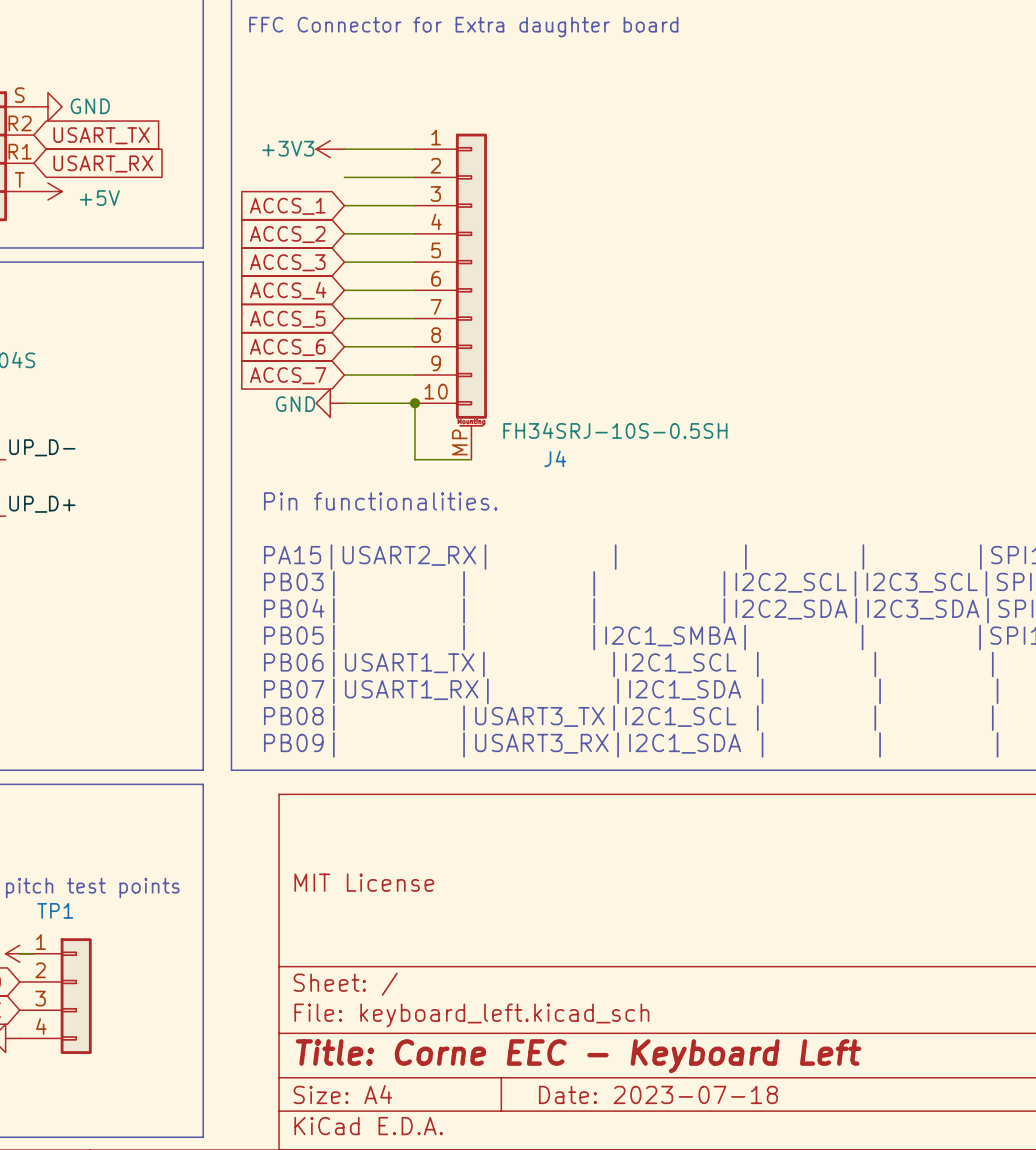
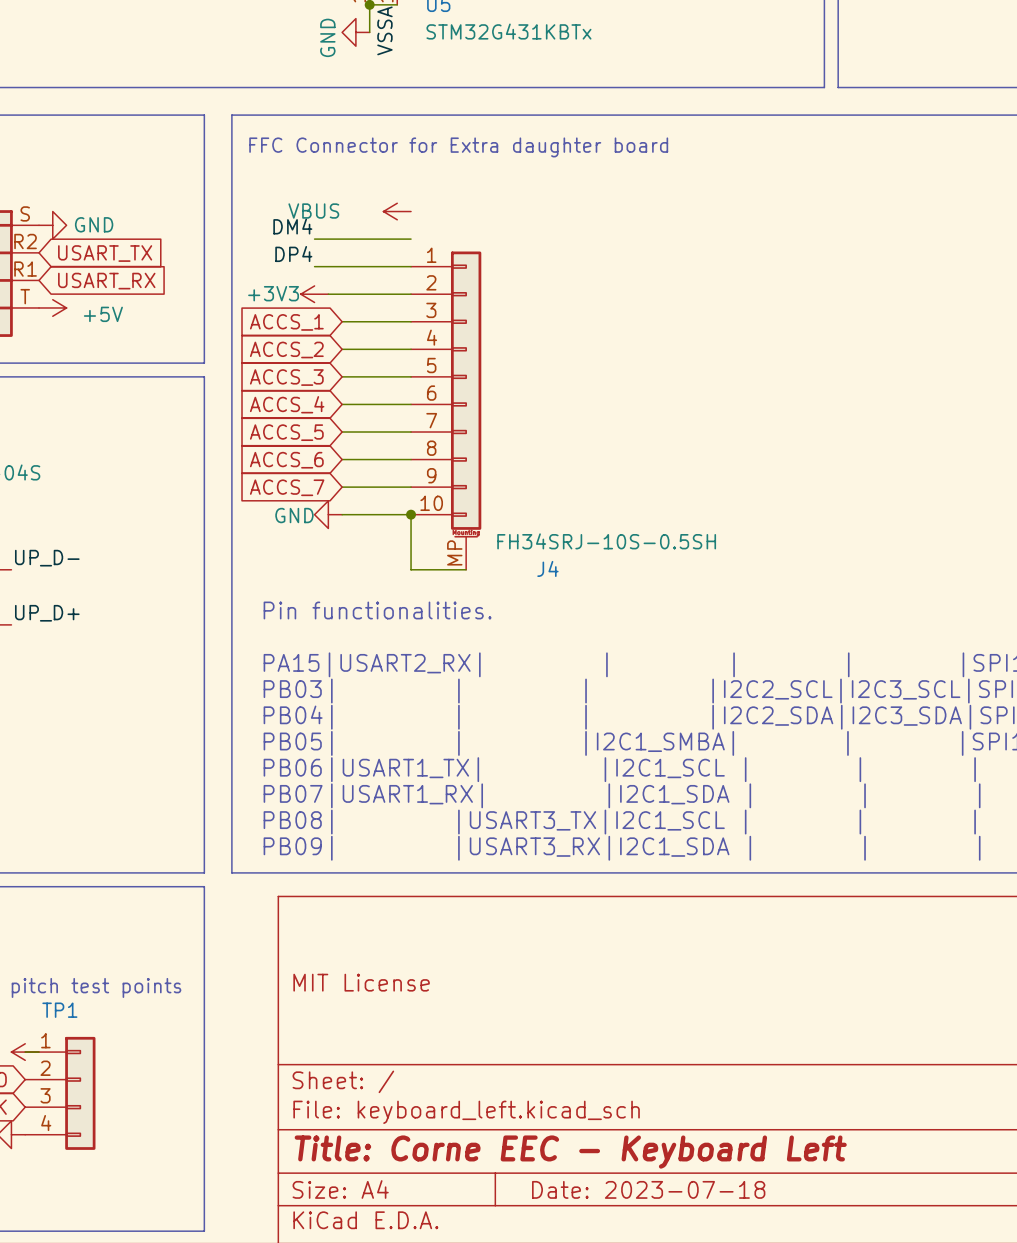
power symbol: none -> VBUS (397, 211)
label: none -> DM4 (292, 226)
wire: none -> (314, 239) (411, 239)
label: none -> DP4 (293, 254)
power symbol position: +3V3 (330, 149) -> +3V3 (314, 294)
wire: none -> (328, 294) (342, 294)

